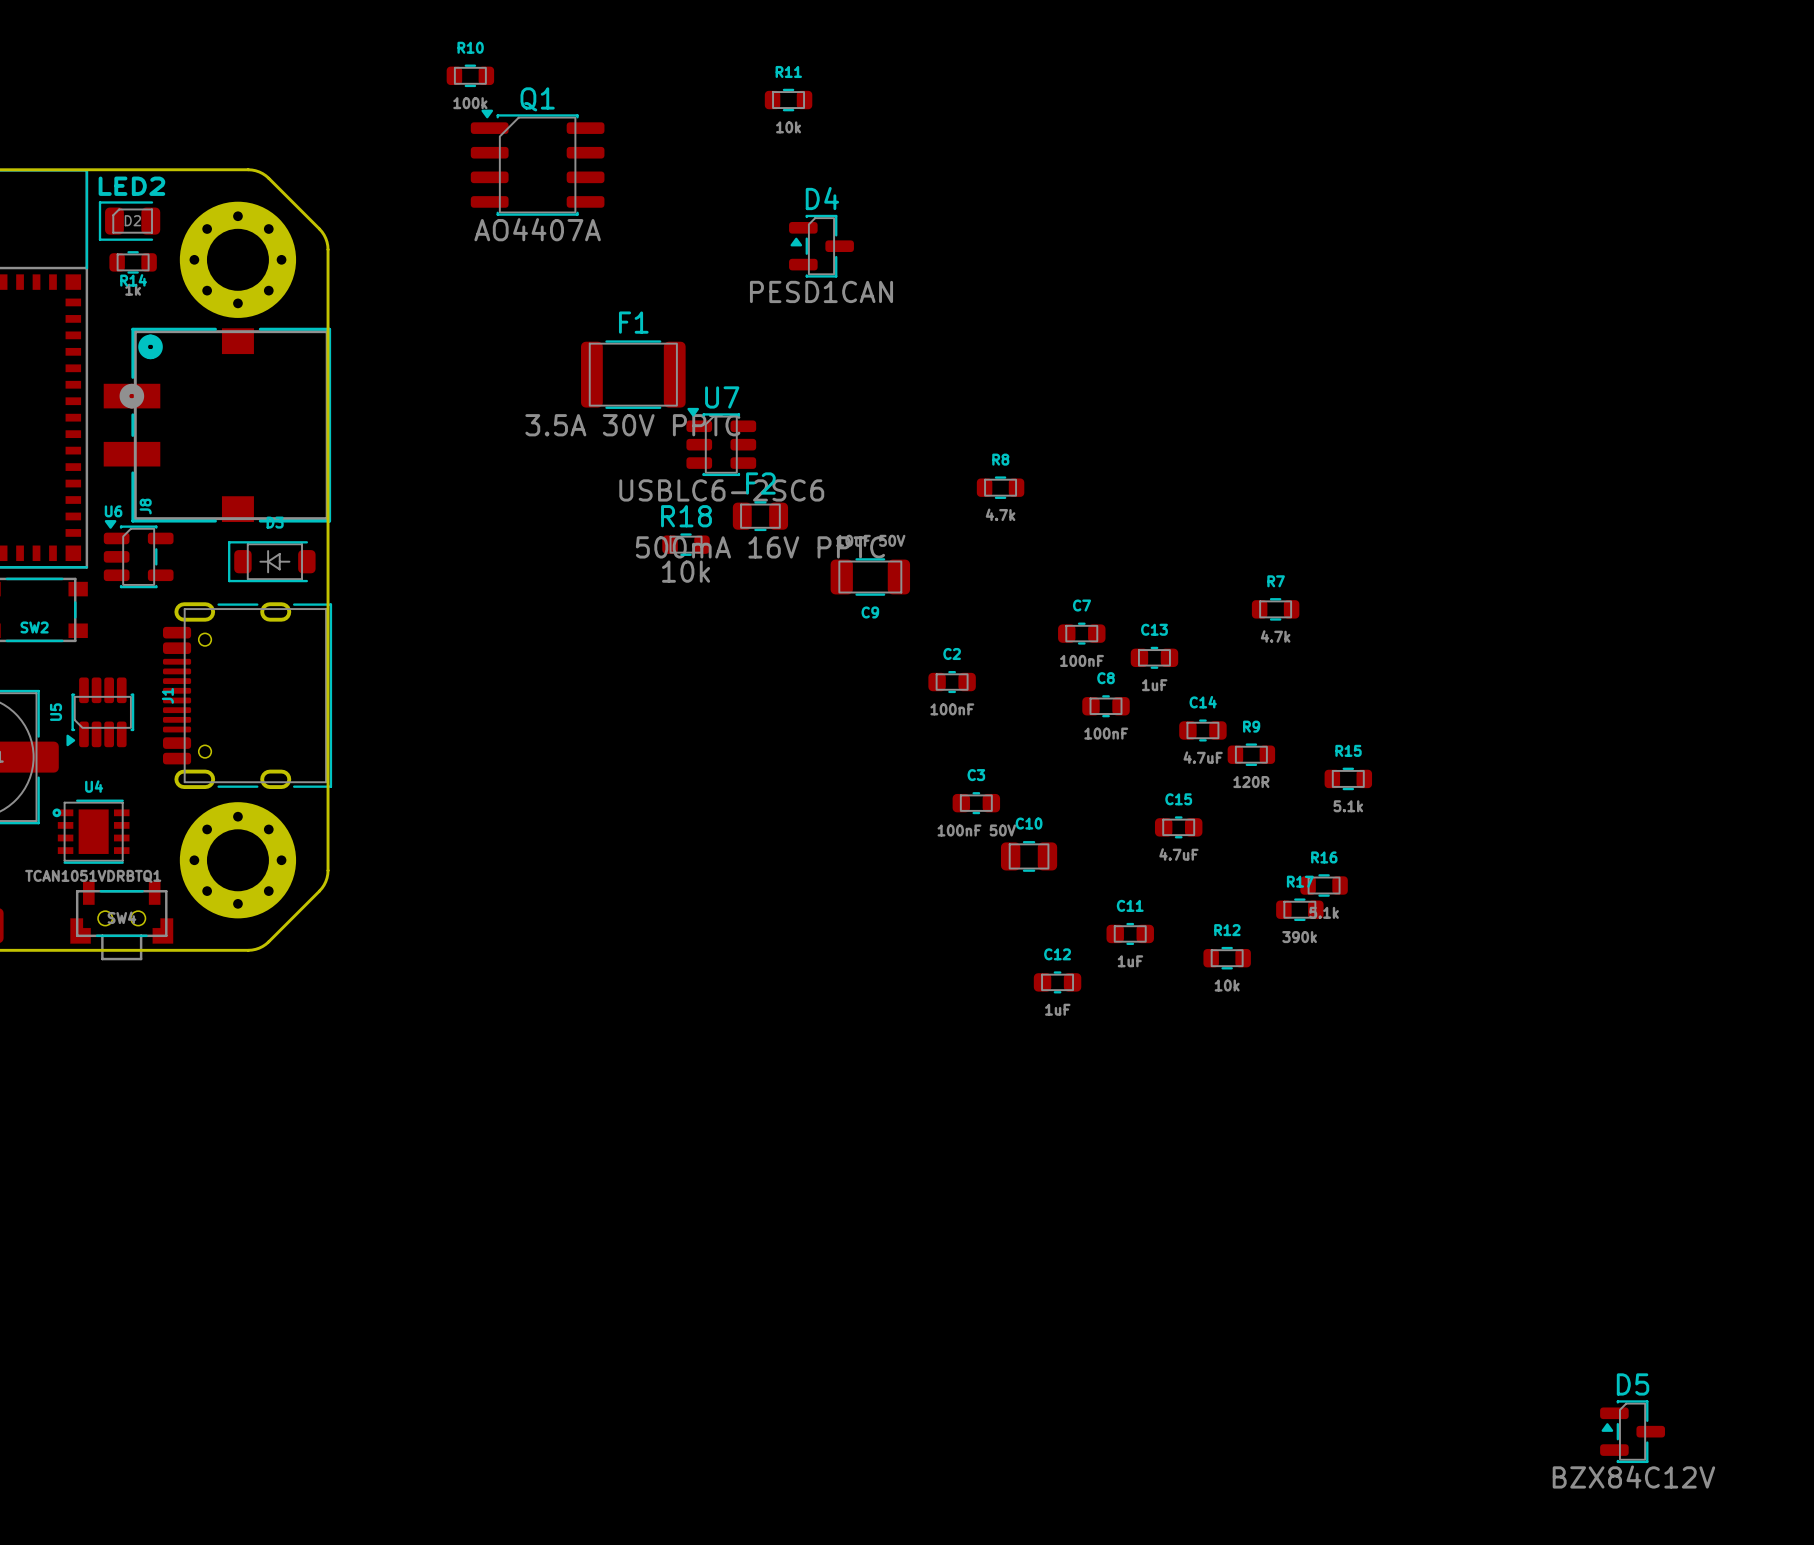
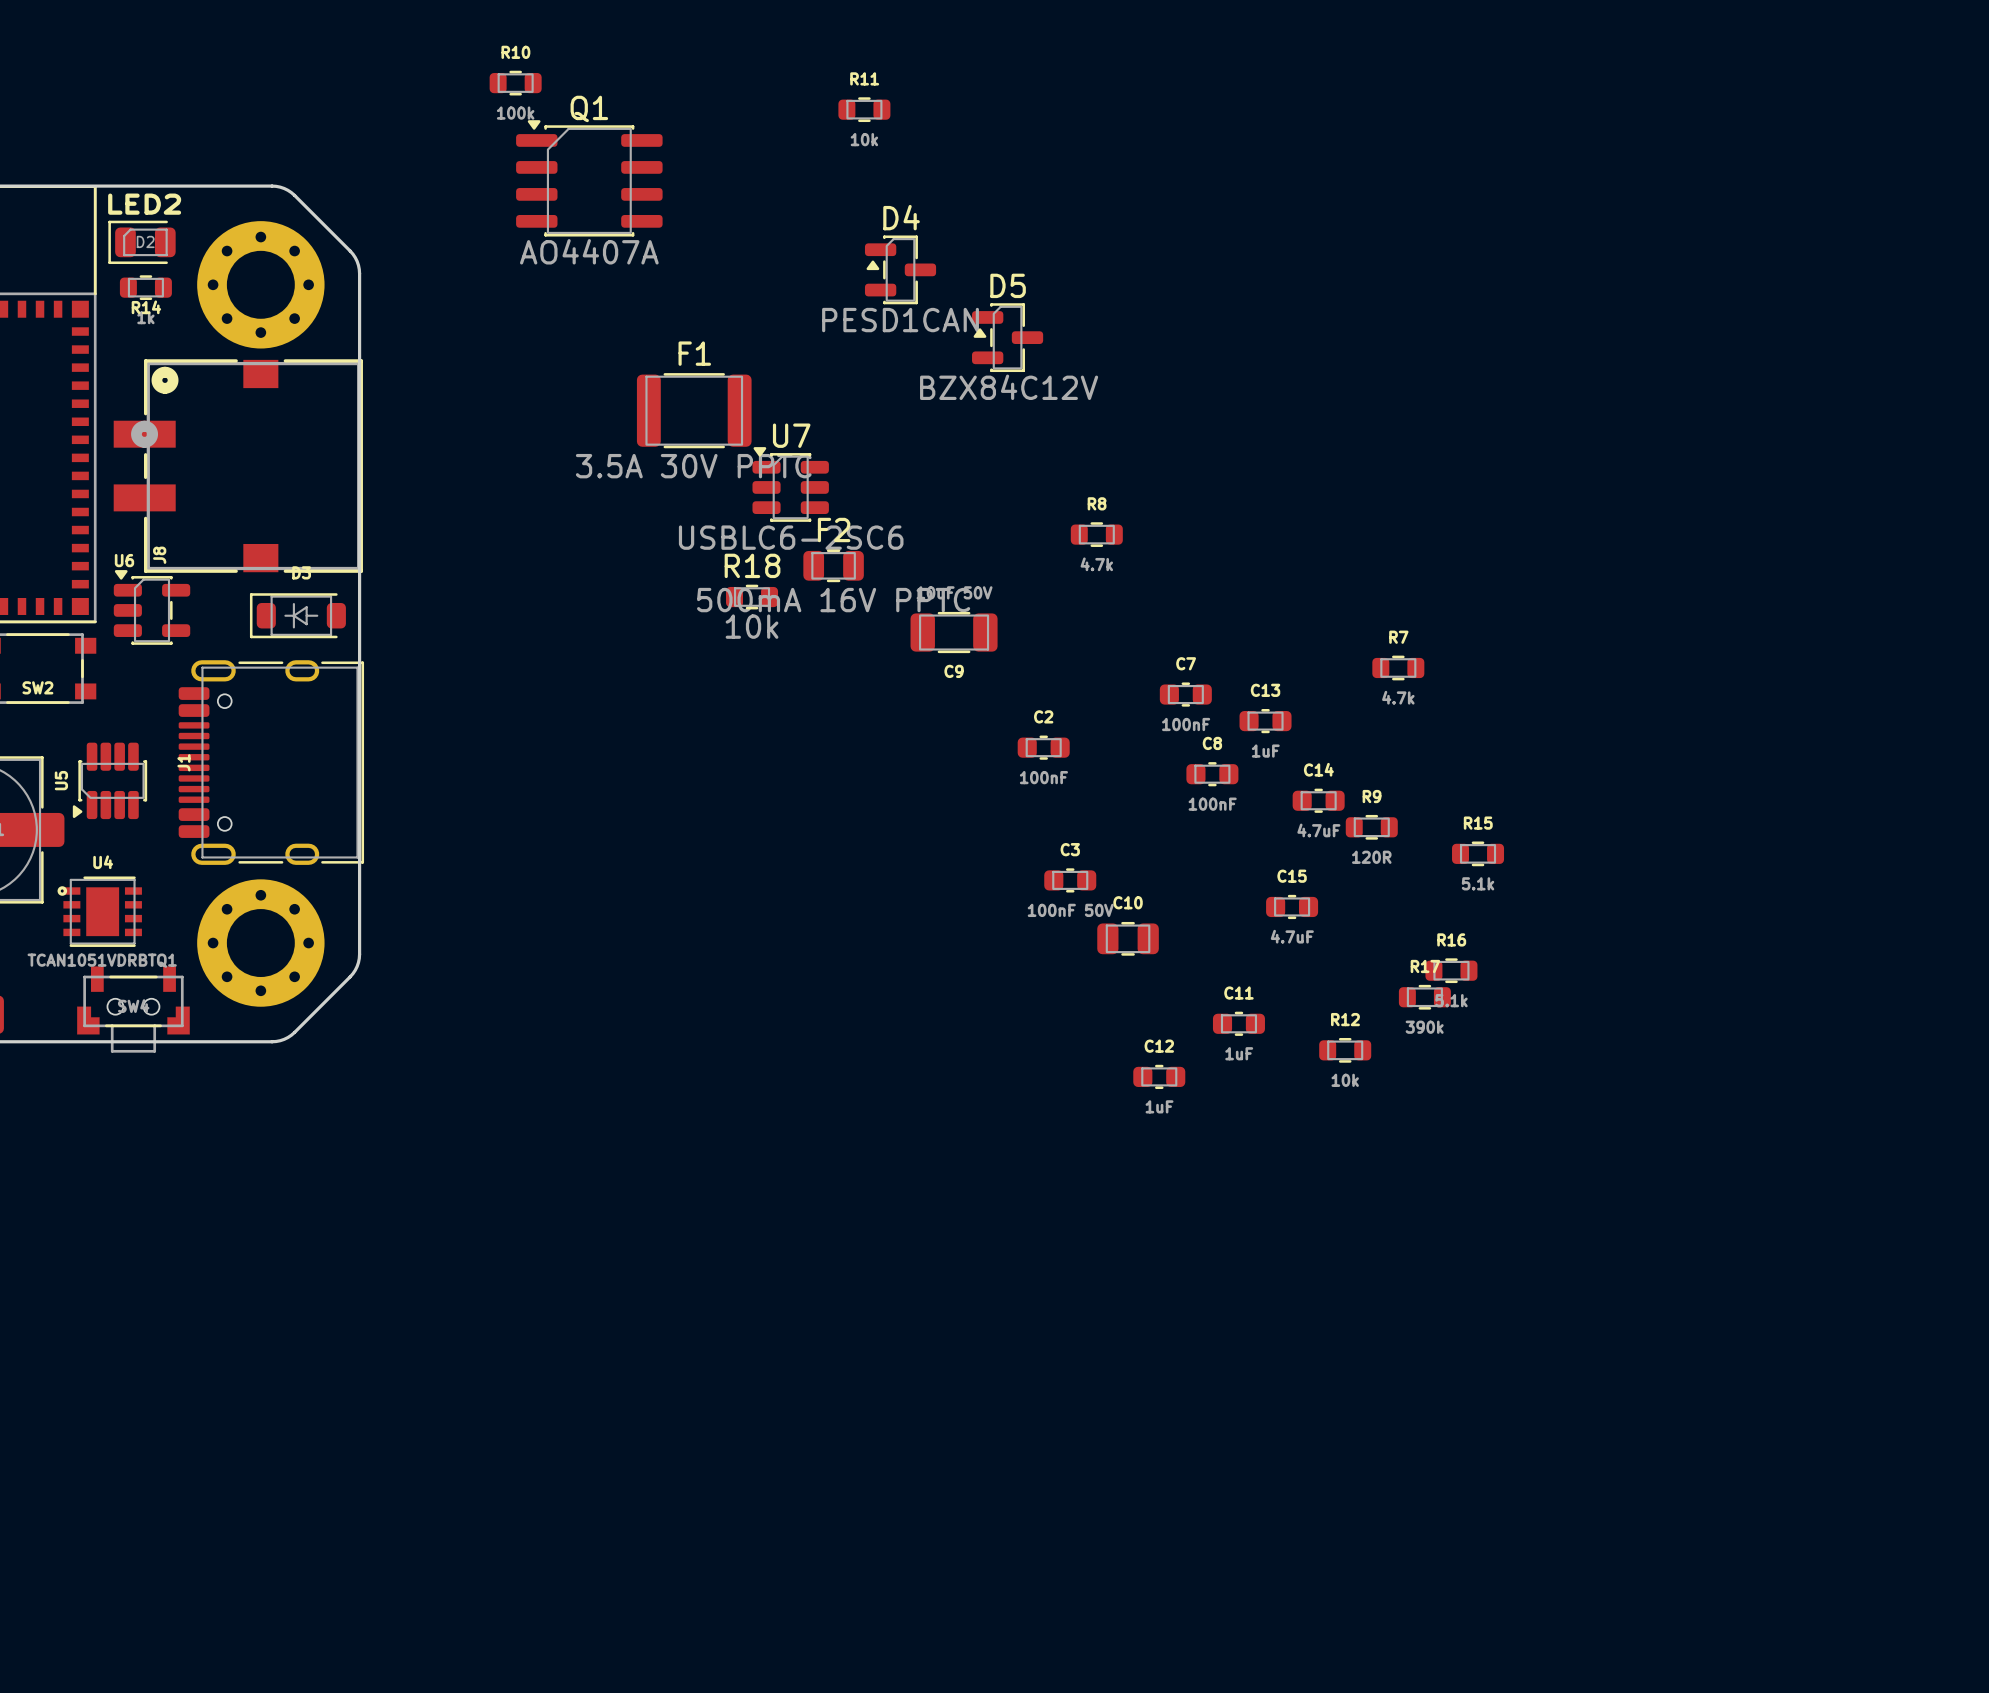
D5 position: (1632, 1431) -> (1007, 337)

